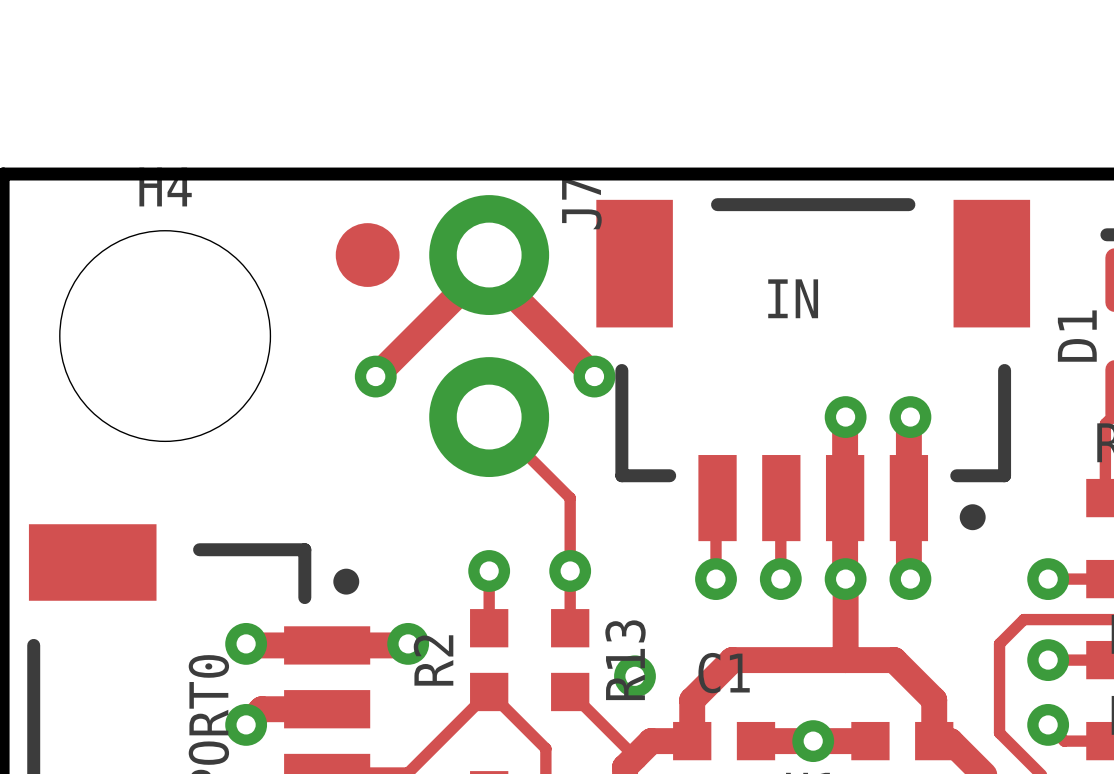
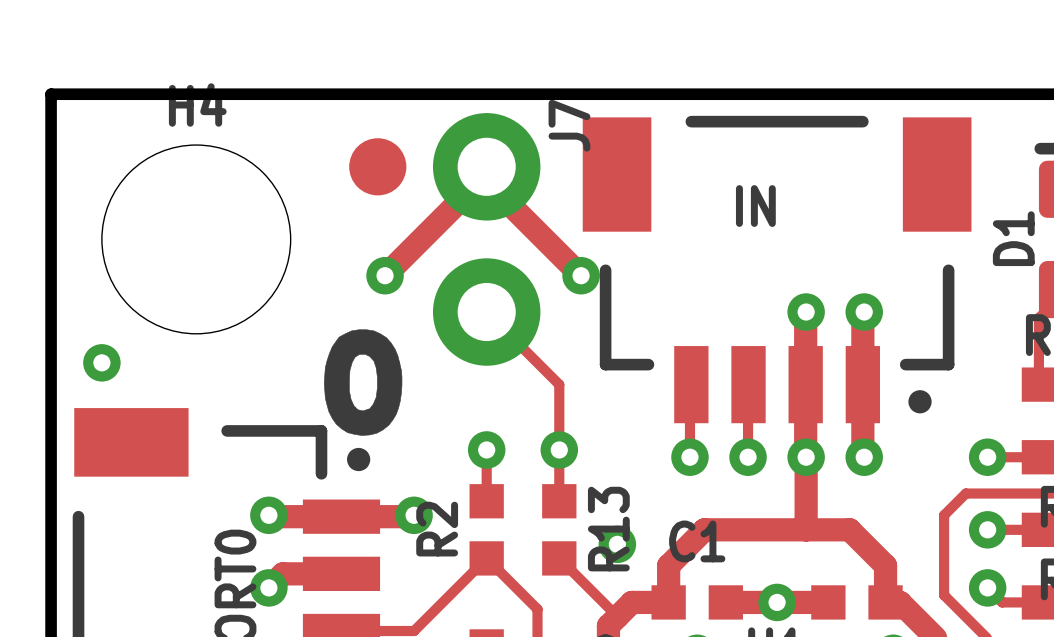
drawing: none -> [323, 329, 403, 436]
via: none -> (101, 362)

